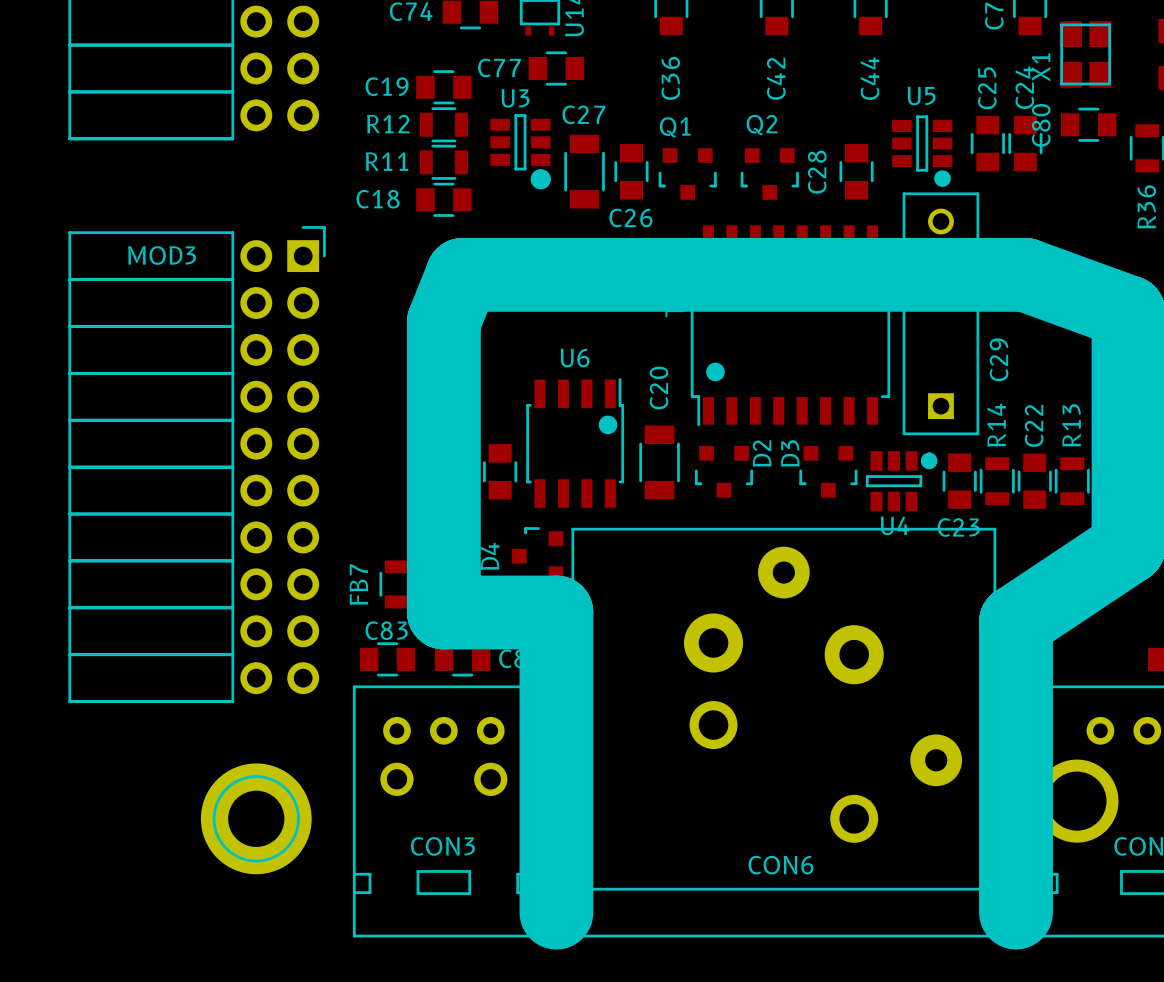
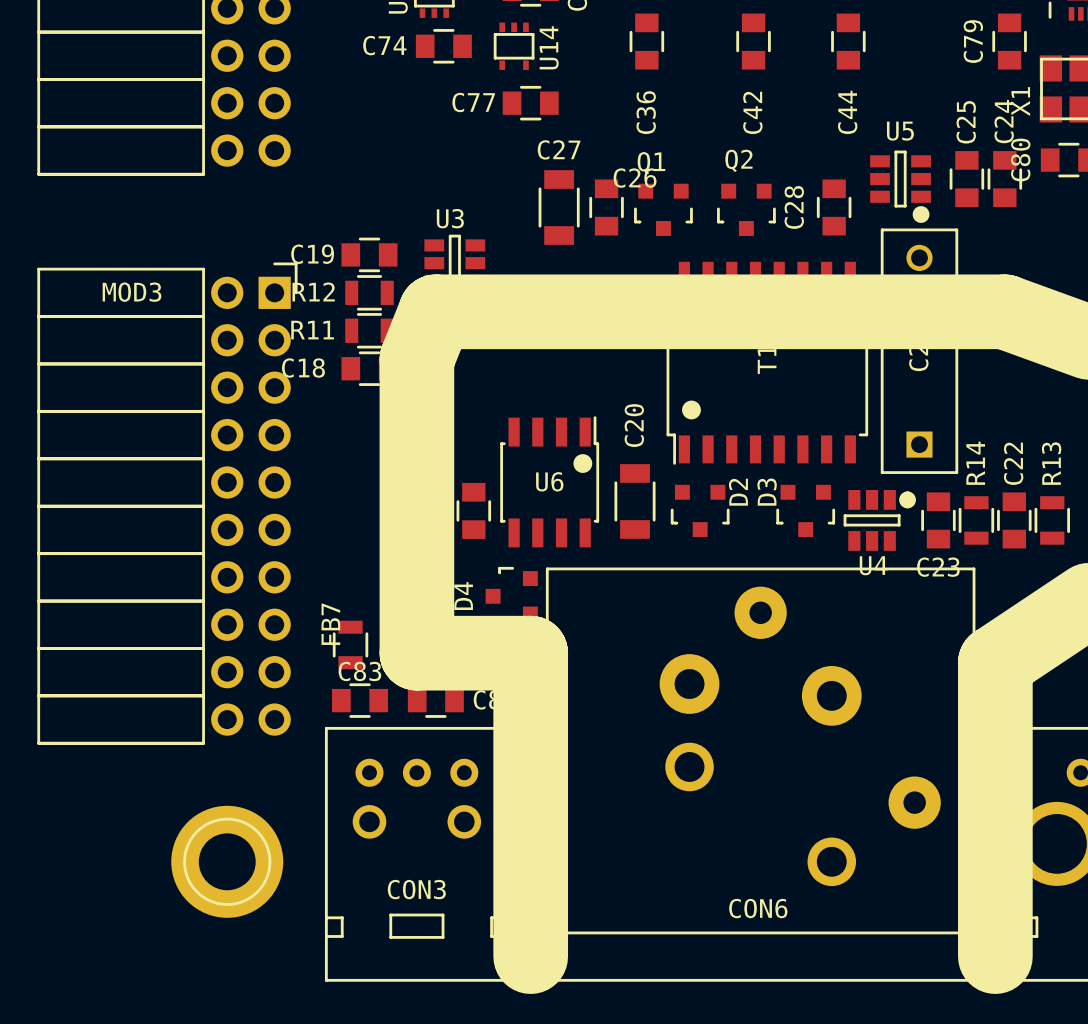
C19 position: (443, 87) -> (369, 254)
R12 position: (443, 124) -> (369, 292)
U3 position: (520, 151) -> (455, 272)
R11 position: (443, 162) -> (369, 330)
C18 position: (443, 199) -> (369, 368)
C26 name position: C26 (630, 217) -> C26 (635, 178)
T1 name position: T1 (674, 304) -> T1 (767, 359)
U6 name position: U6 (575, 358) -> U6 (549, 481)
C29 name position: C29 (999, 359) -> C29 (918, 349)
FB7 position: (396, 584) -> (350, 644)

